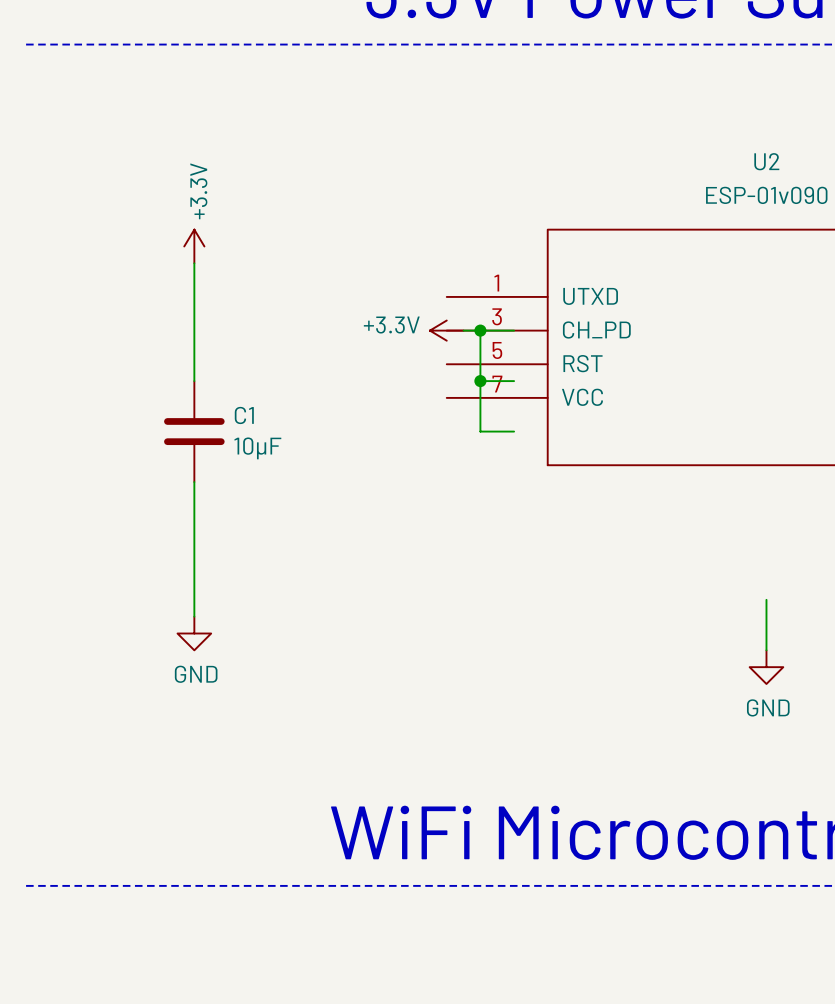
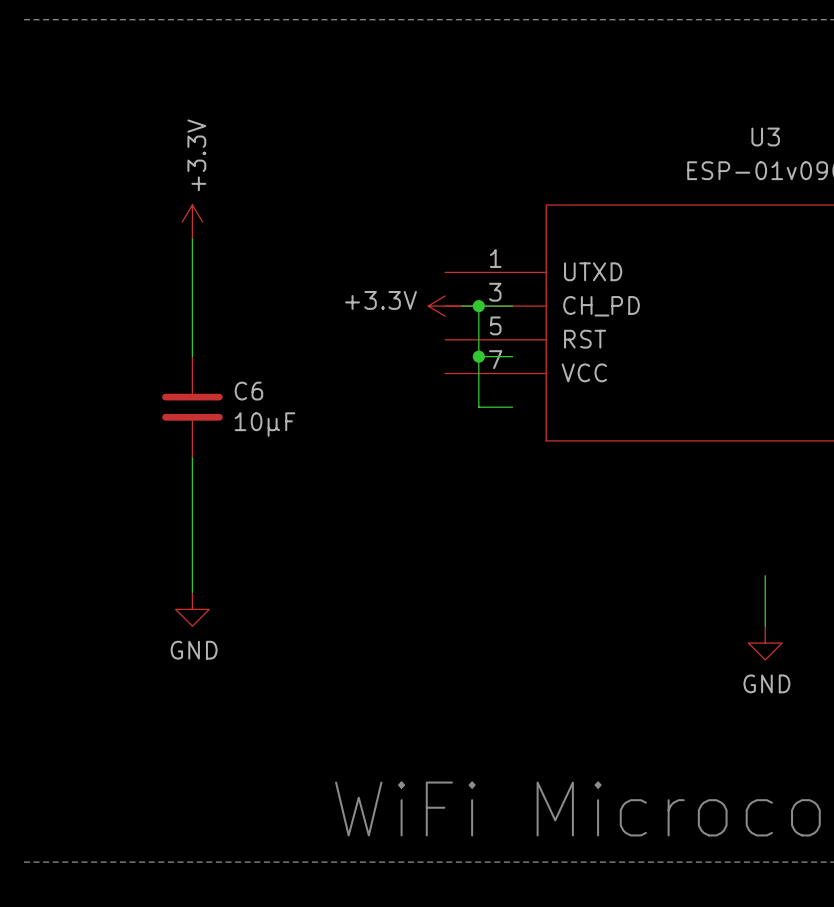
U2 name: U2 (766, 161) -> U3 (765, 137)
C1 name: C1 (244, 415) -> C6 (248, 391)

